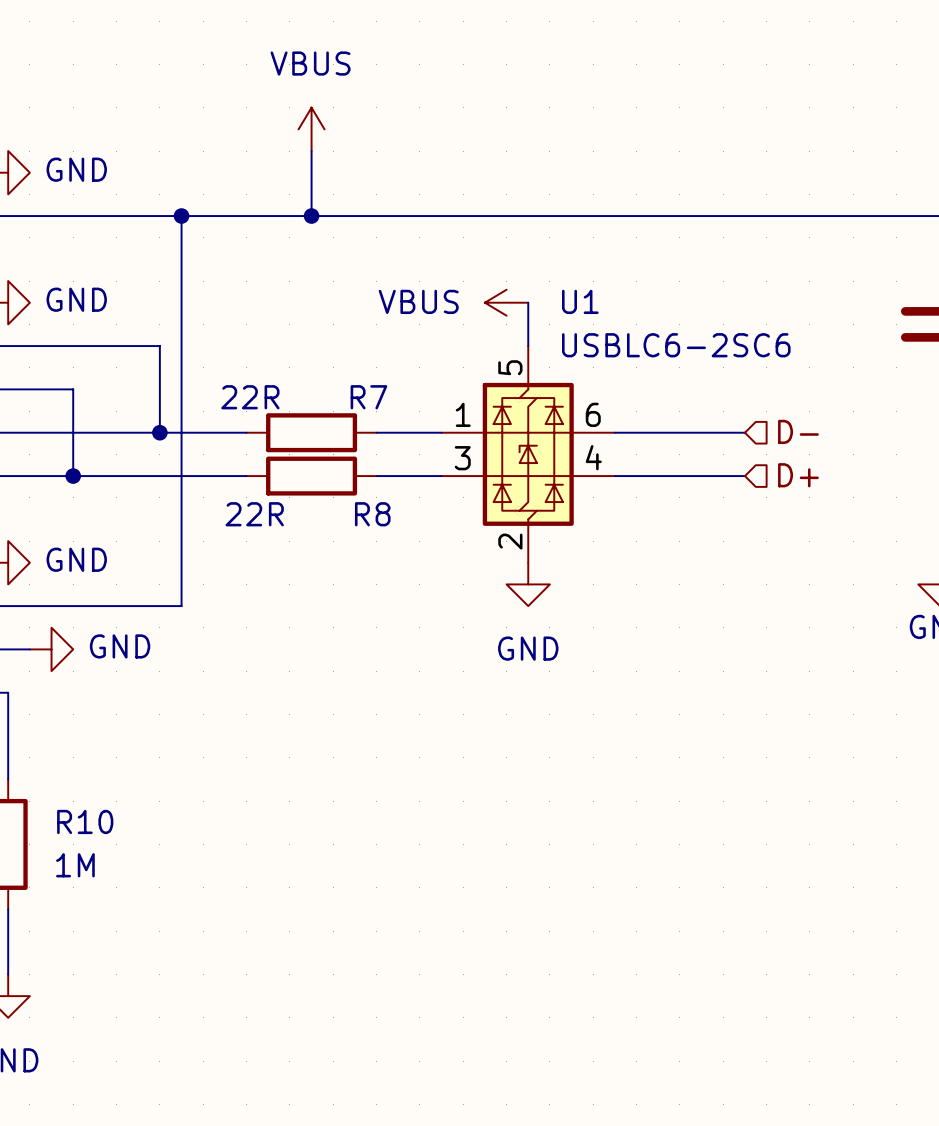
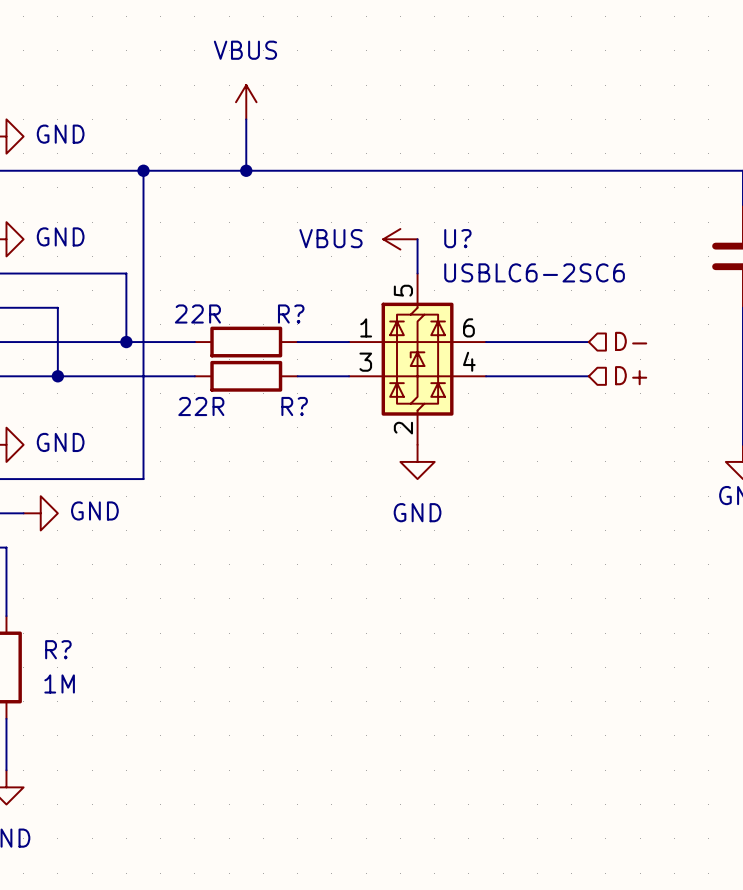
U1 name: U1 (580, 301) -> U? (457, 238)
R7 name: R7 (368, 397) -> R? (291, 314)
R8 name: R8 (372, 514) -> R? (294, 406)
R10 name: R10 (85, 821) -> R? (58, 649)

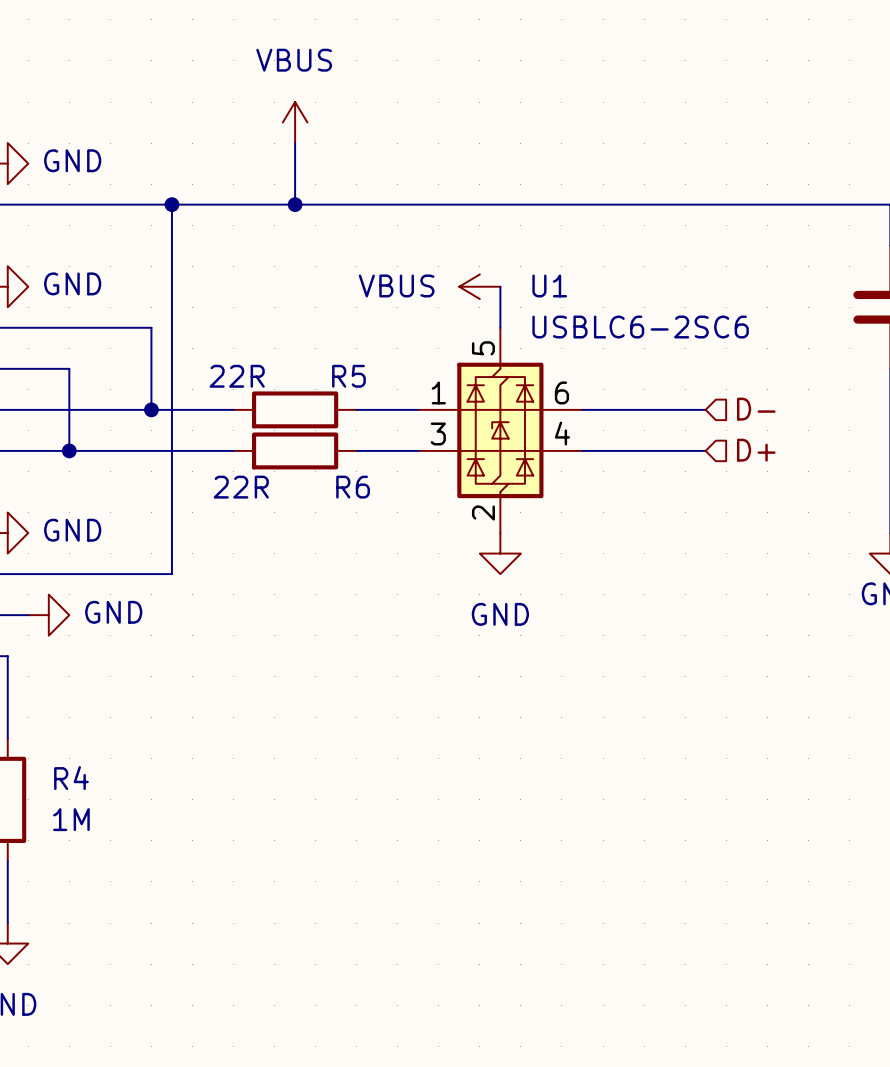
U? name: U? (457, 238) -> U1 (549, 285)
R? name: R? (291, 314) -> R5 (348, 376)
R? name: R? (294, 406) -> R6 (353, 487)
R? name: R? (58, 649) -> R4 (71, 778)

